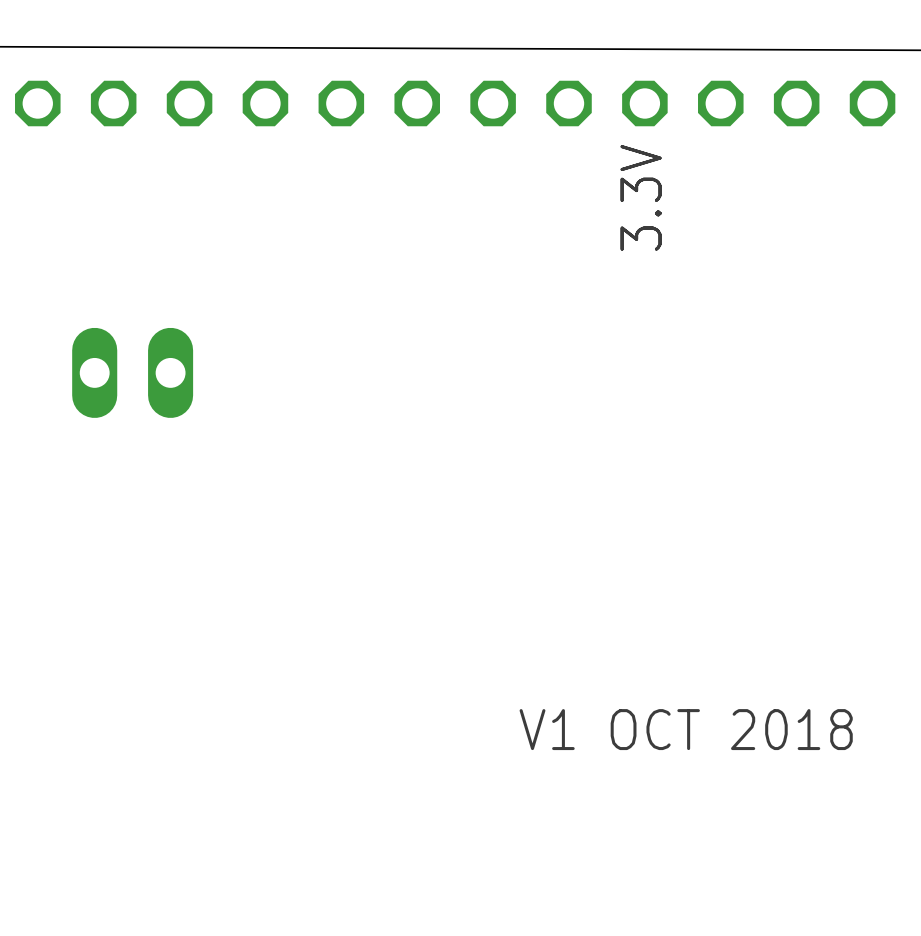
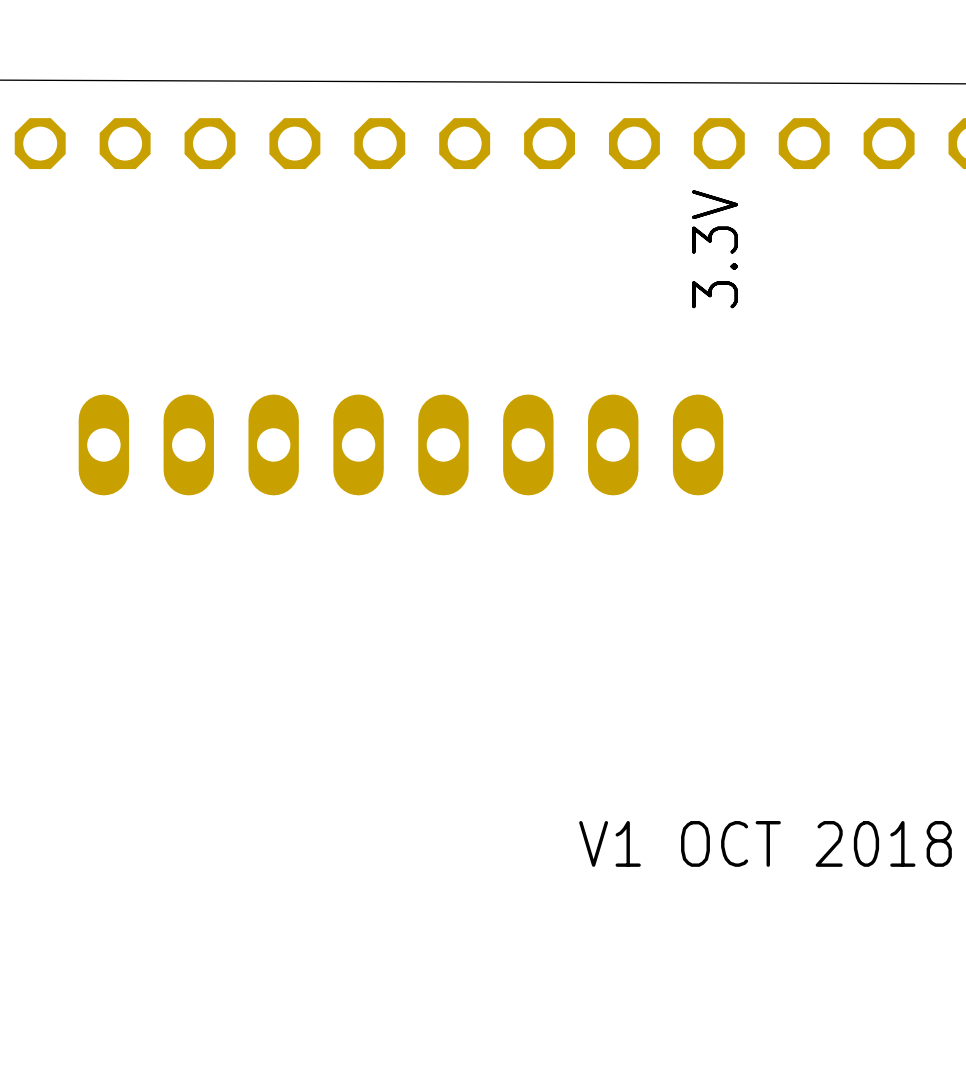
part: none -> (401, 444)

